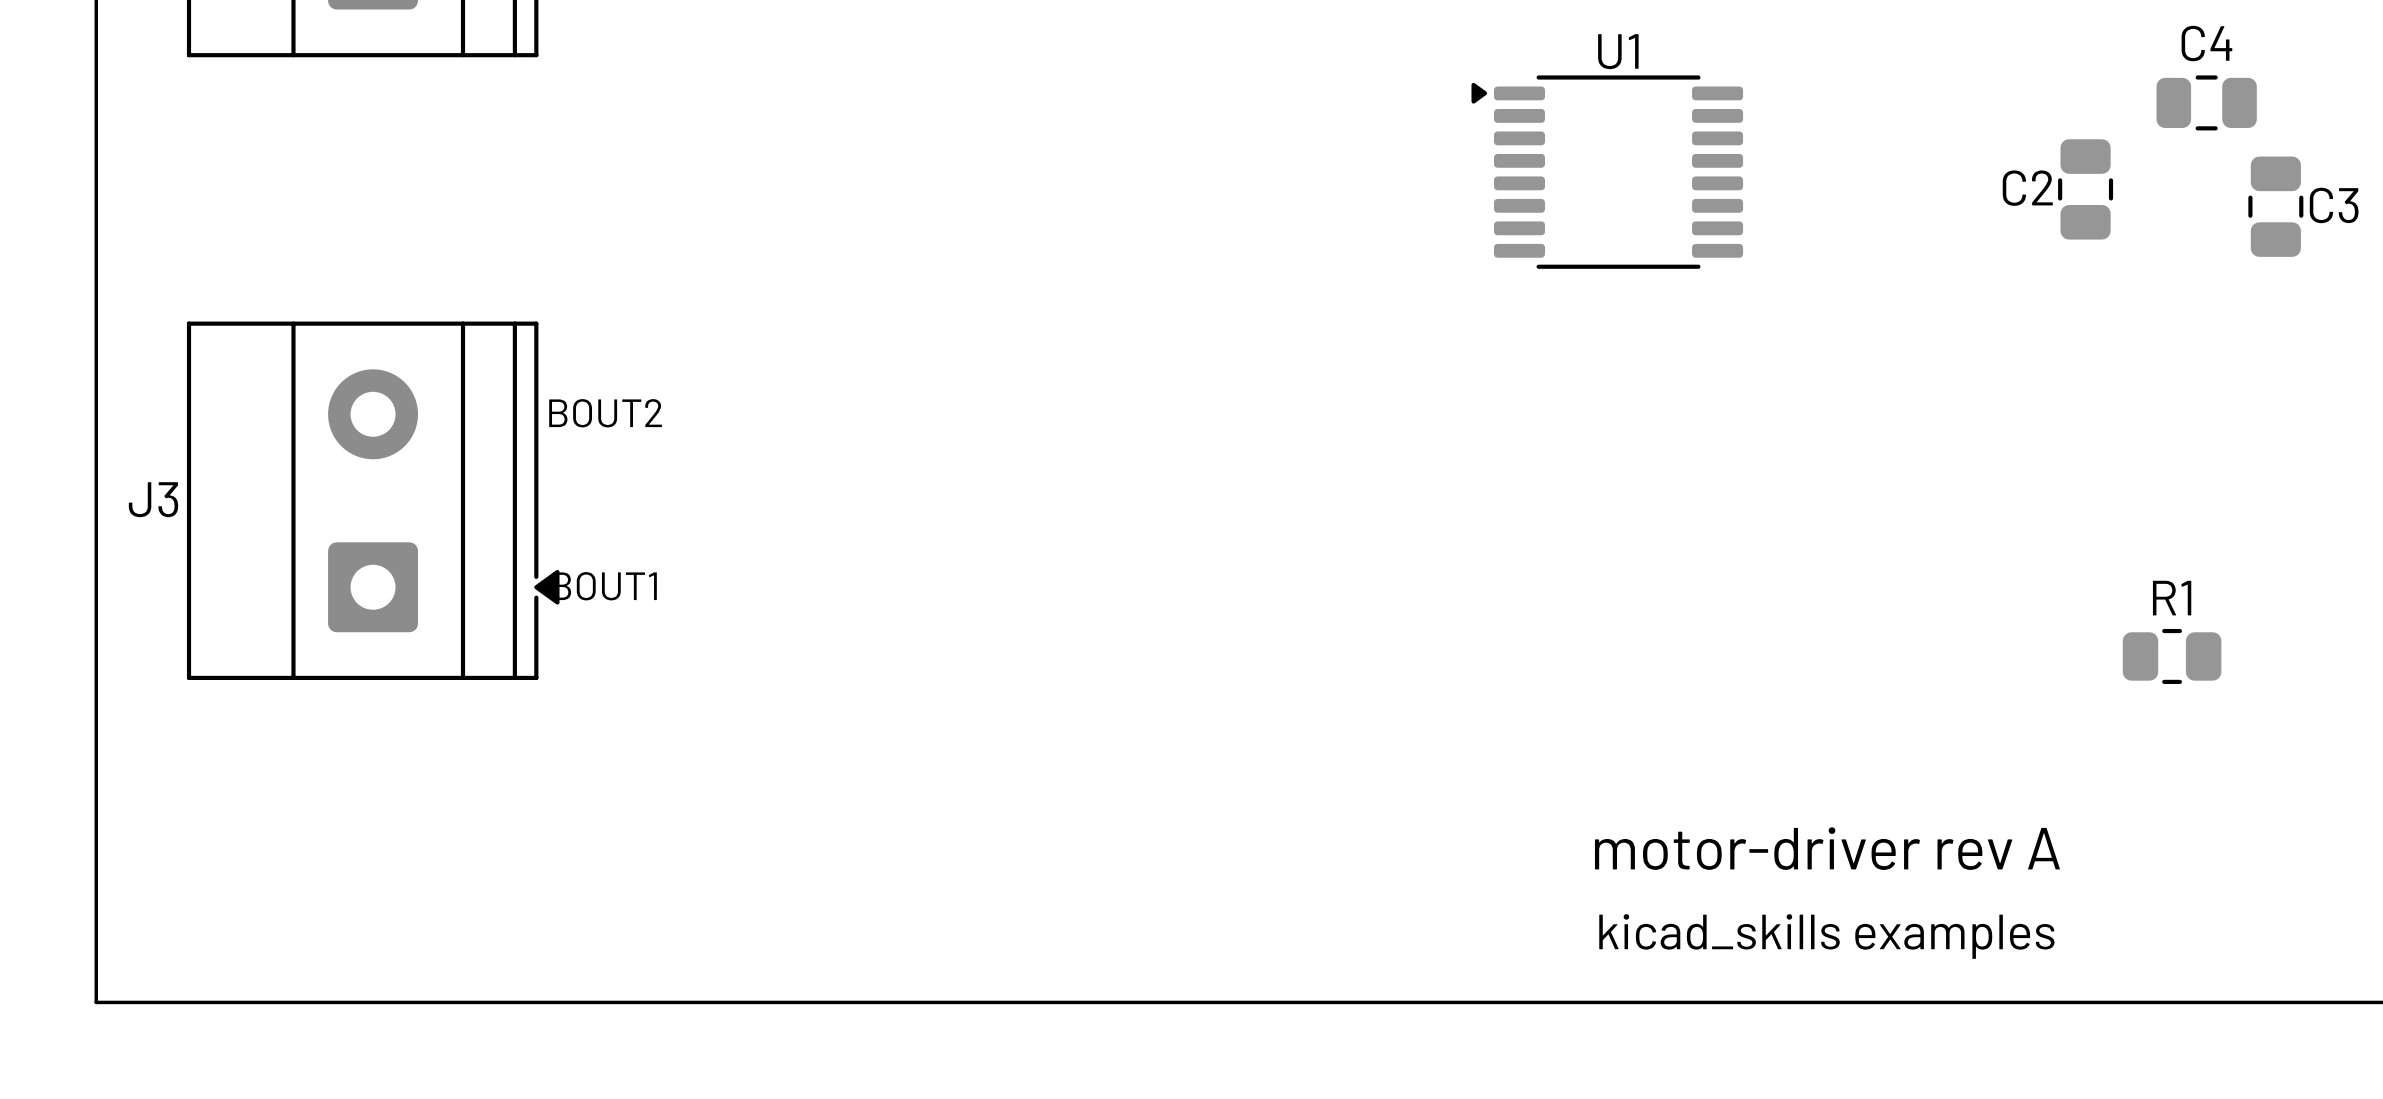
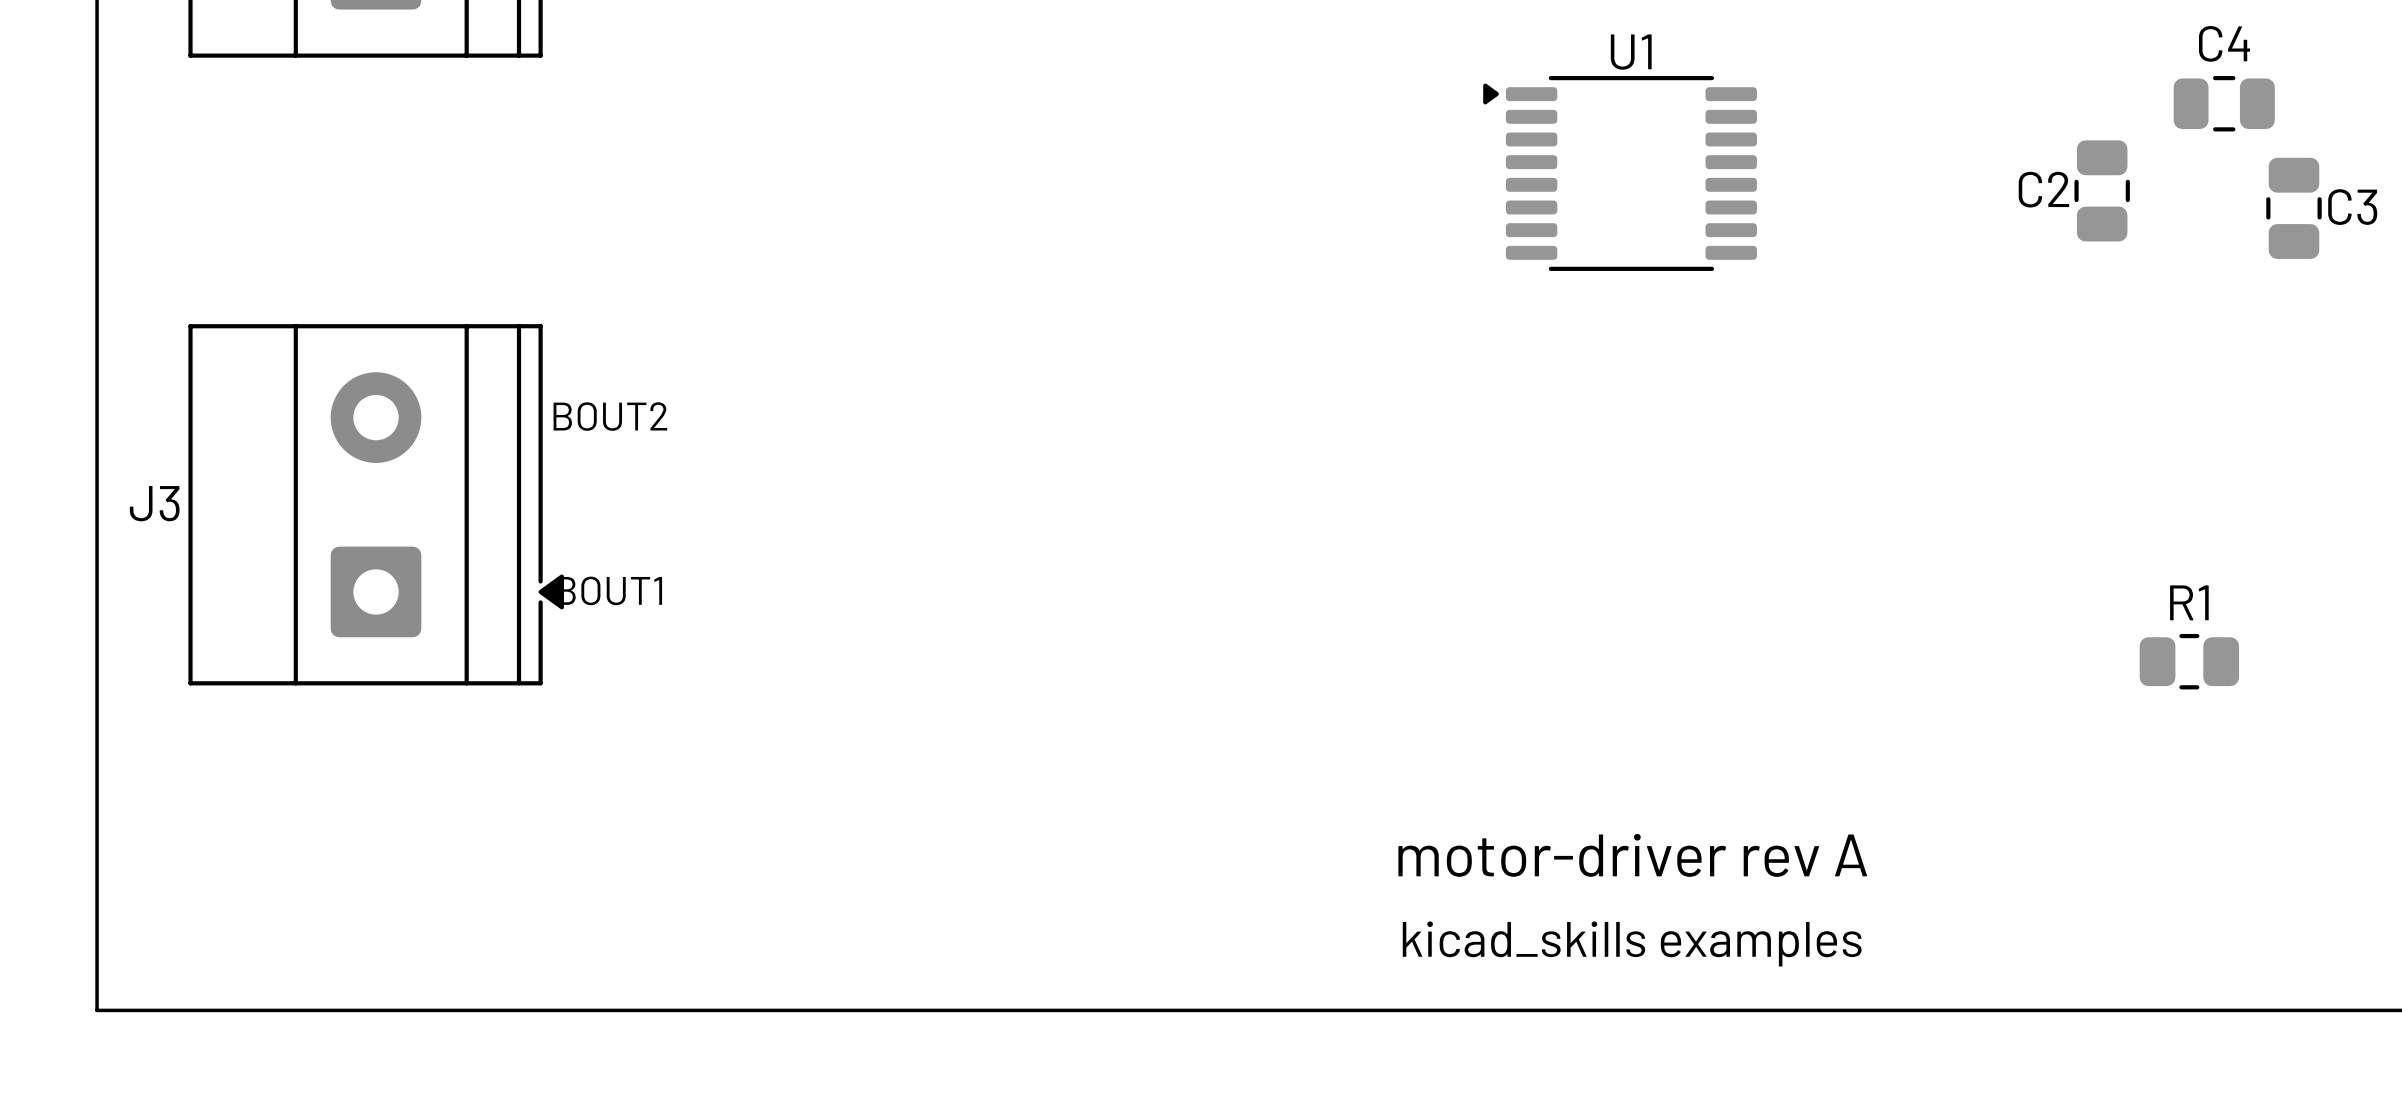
text position: motor-driver rev A (1827, 848) -> motor-driver rev A (1632, 855)
text position: kicad_skills examples (1826, 936) -> kicad_skills examples (1632, 943)

